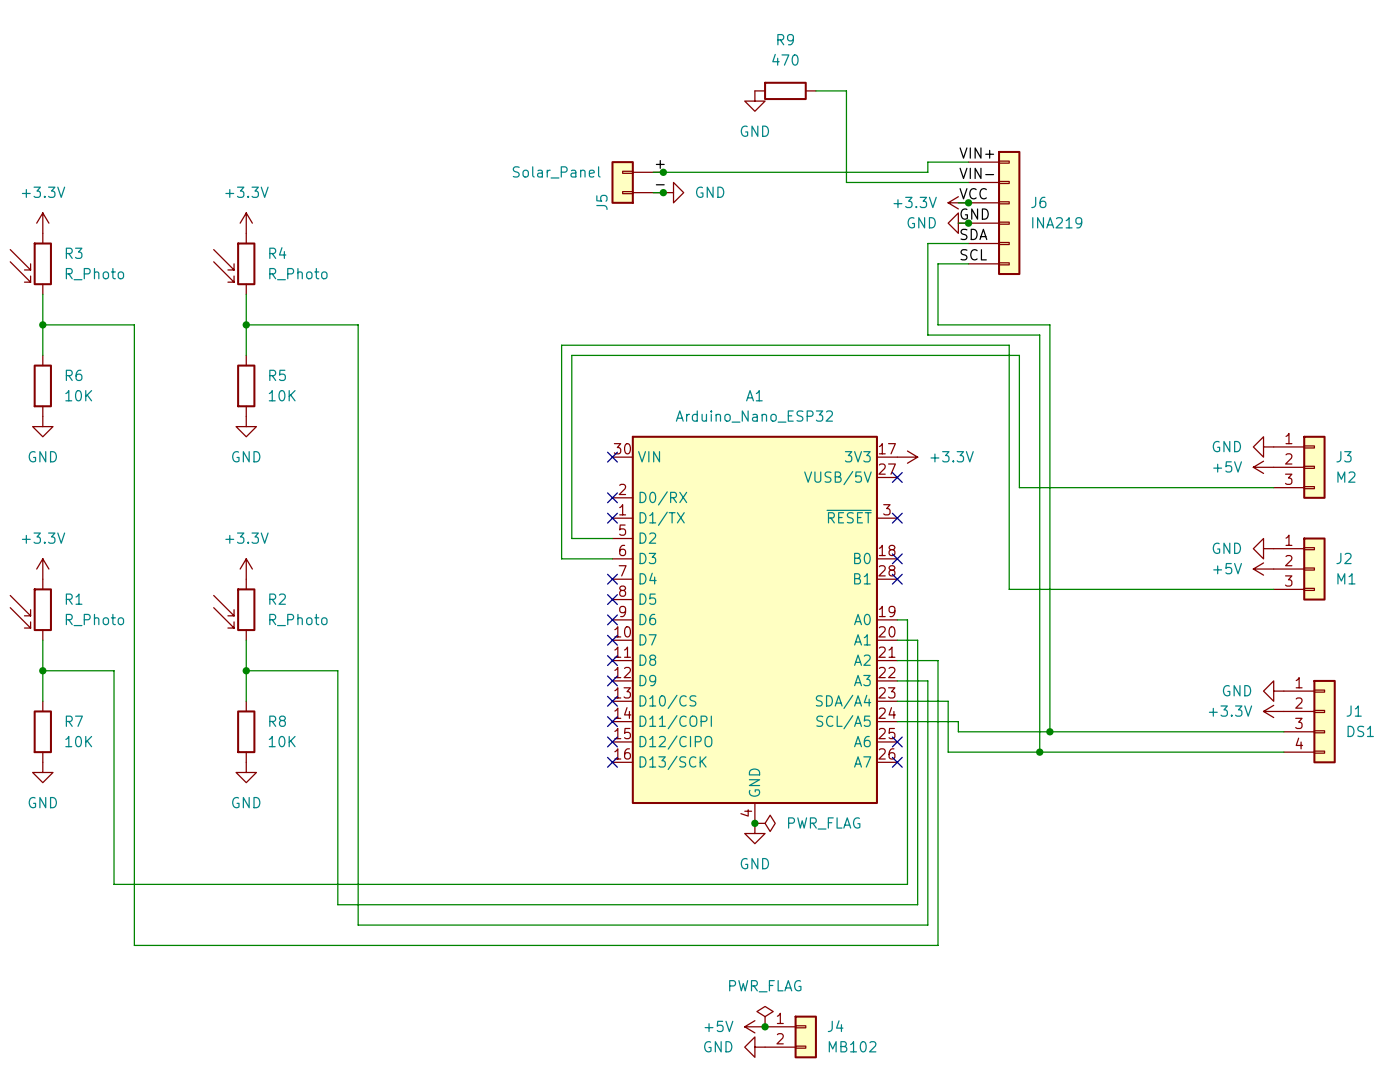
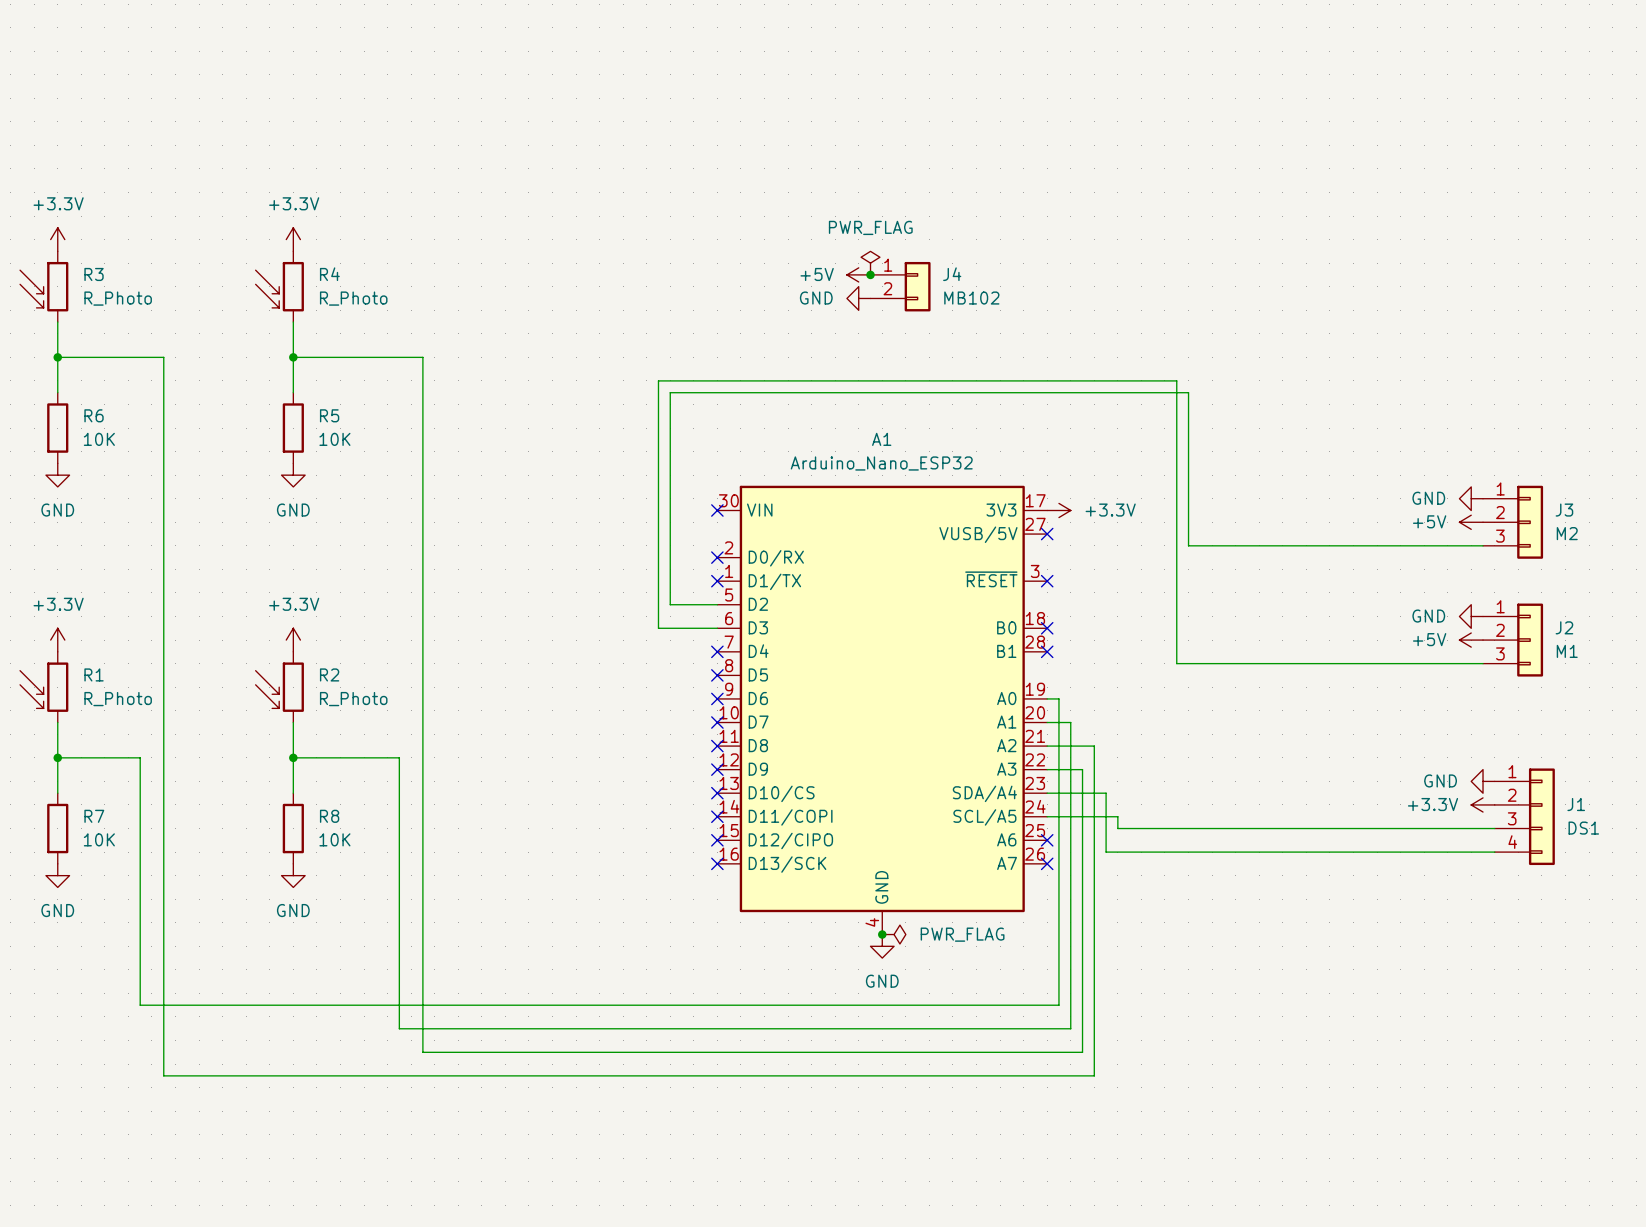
R9: 470 (785, 90) -> none
wire: (815, 90) (846, 90) (846, 182) (968, 182) -> none
power symbol: GND (754, 101) -> none
label: VIN+ (976, 153) -> none
wire: (968, 162) (927, 162) (927, 172) (653, 172) -> none
label: + (660, 164) -> none
junction: (663, 172) -> none
label: VIN- (976, 173) -> none
J5: Solar_Panel (637, 182) -> none
label: - (660, 184) -> none
wire: (653, 192) (663, 192) -> none
junction: (663, 192) -> none
power symbol: GND (673, 192) -> none
label: VCC (973, 193) -> none
wire: (958, 202) (968, 202) -> none
power symbol: +3.3V (958, 202) -> none
junction: (968, 202) -> none
J6: INA219 (994, 212) -> none
label: GND (974, 214) -> none
wire: (958, 223) (968, 223) -> none
power symbol: GND (958, 223) -> none
junction: (968, 223) -> none
label: SDA (973, 234) -> none
power symbol: none -> PWR_FLAG (870, 263)
wire: (968, 243) (927, 243) (927, 335) (1039, 335) (1039, 752) -> none
power symbol: none -> +5V (858, 274)
junction: none -> (870, 274)
label: SCL (973, 254) -> none
wire: (968, 263) (938, 263) (938, 324) (1049, 324) (1049, 731) -> none
power symbol: none -> GND (858, 298)
junction: (1049, 731) -> none
junction: (1039, 752) -> none
power symbol: PWR_FLAG (765, 1016) -> none
power symbol: +5V (754, 1026) -> none
junction: (765, 1026) -> none
J4 position: (791, 1036) -> (900, 286)
power symbol: GND (754, 1047) -> none

